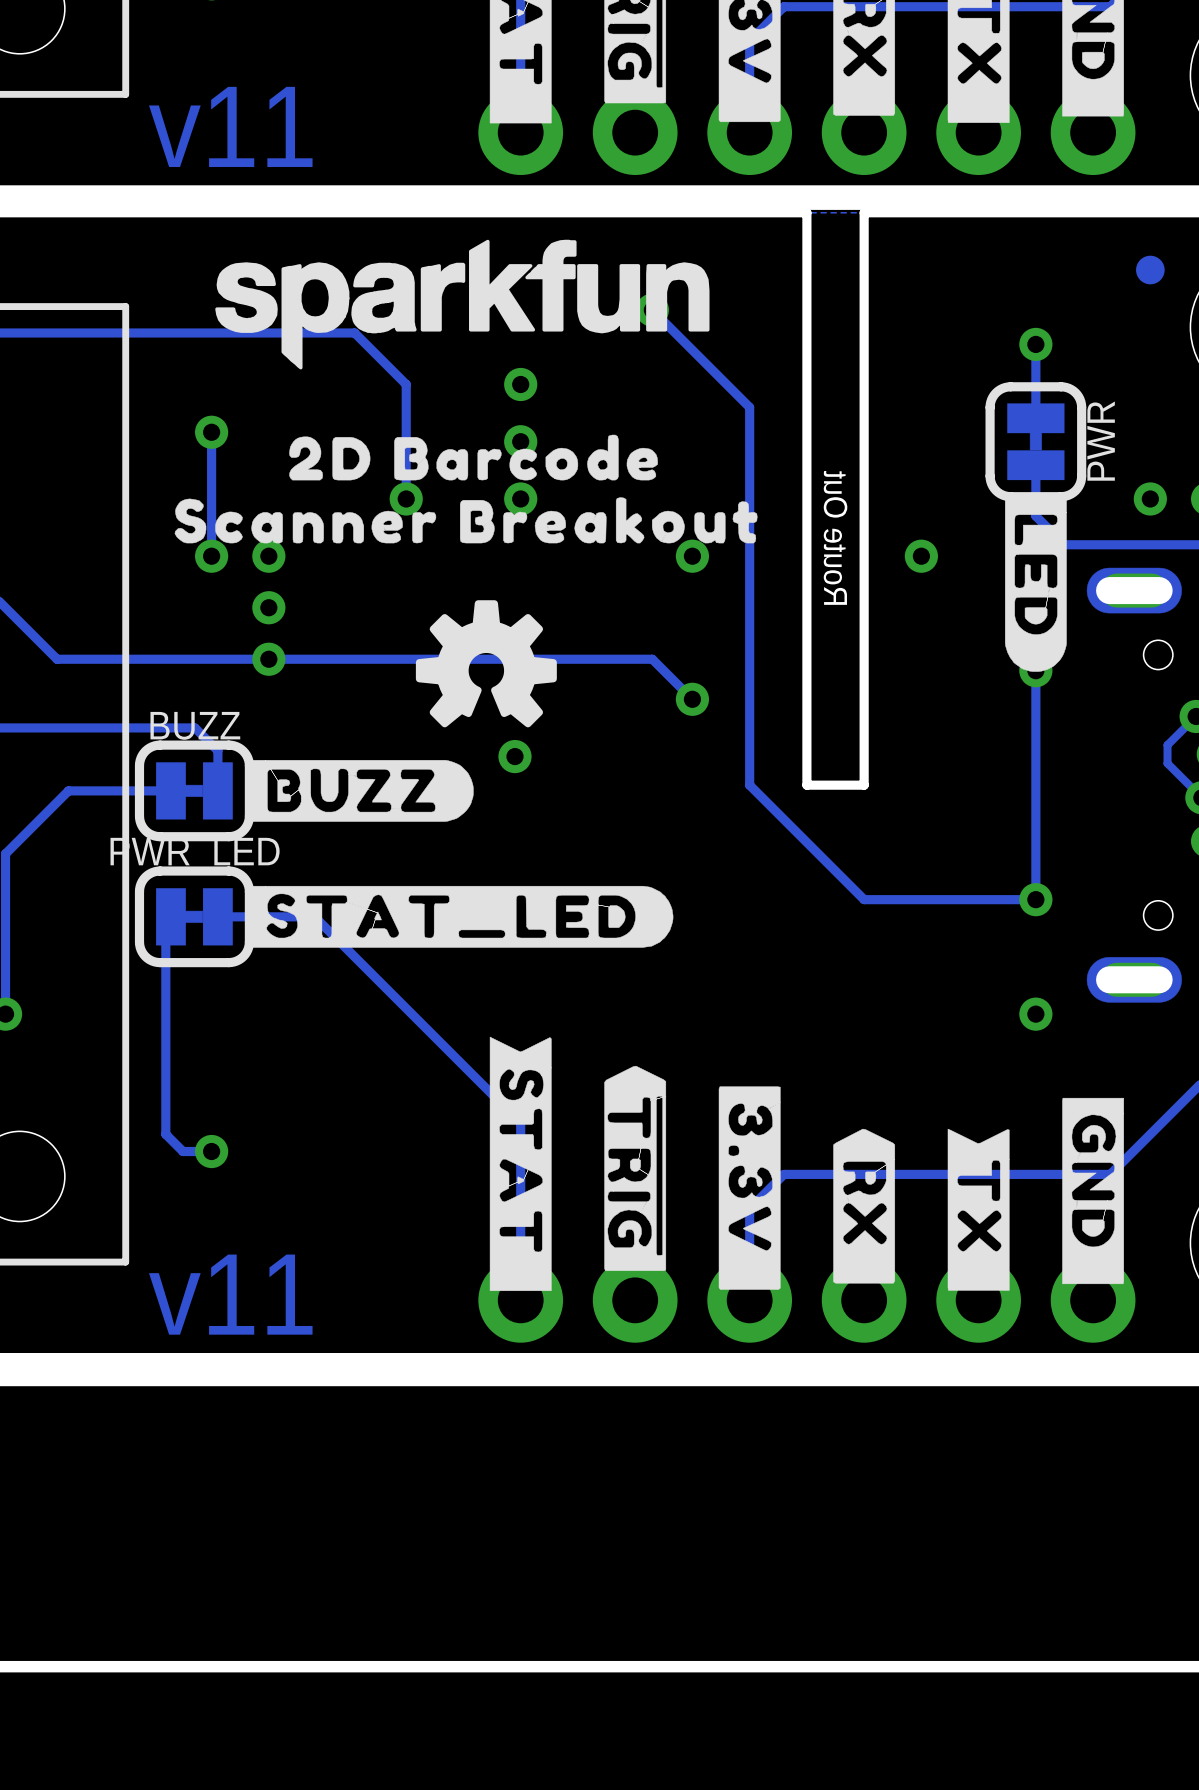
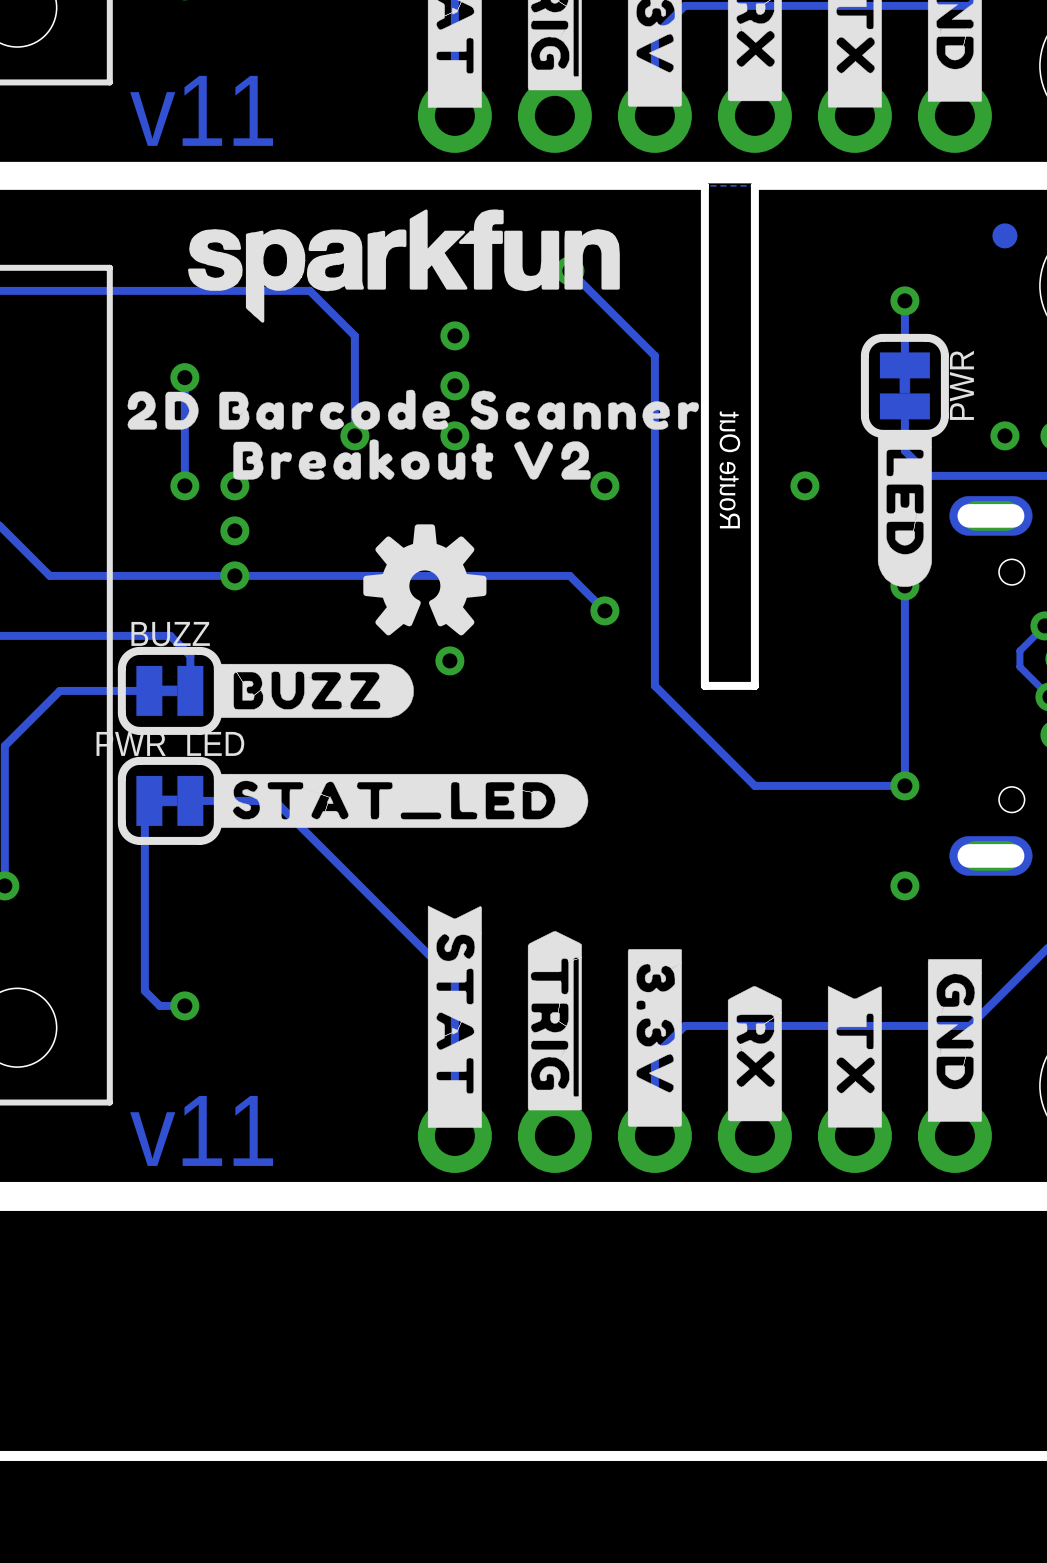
drawing shape: [289, 434, 658, 481] -> [127, 389, 699, 430]
drawing shape: [174, 497, 758, 544] -> [233, 439, 591, 480]

